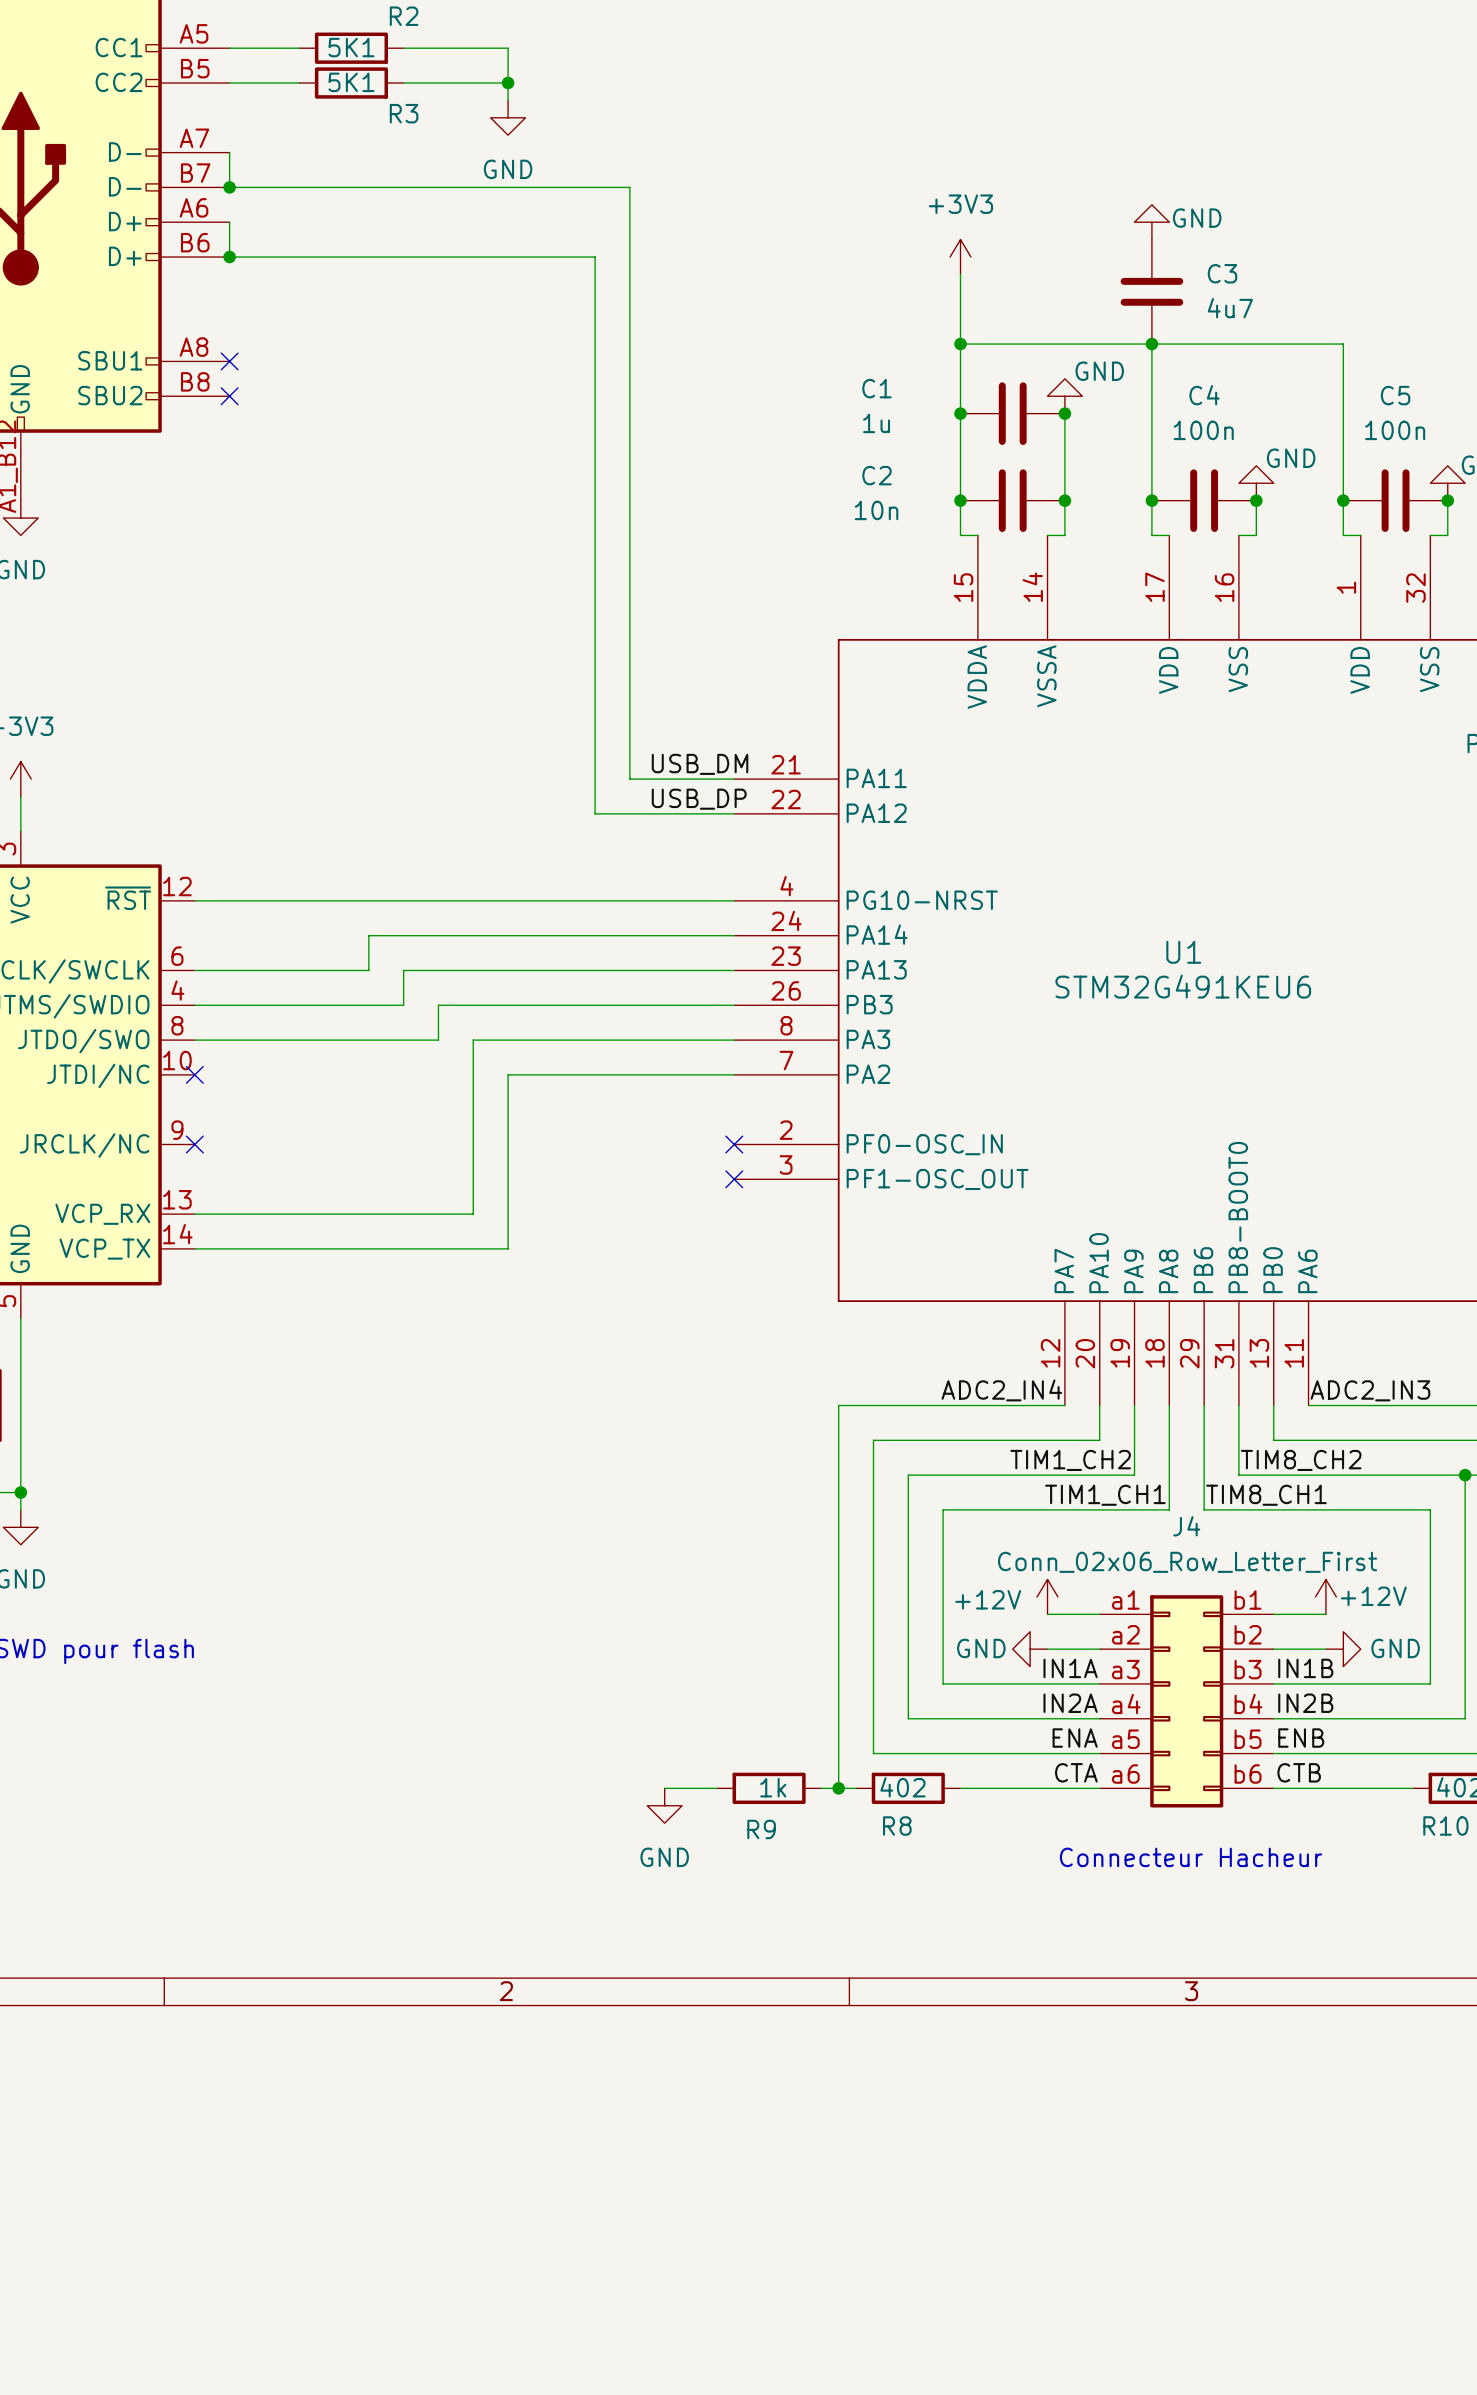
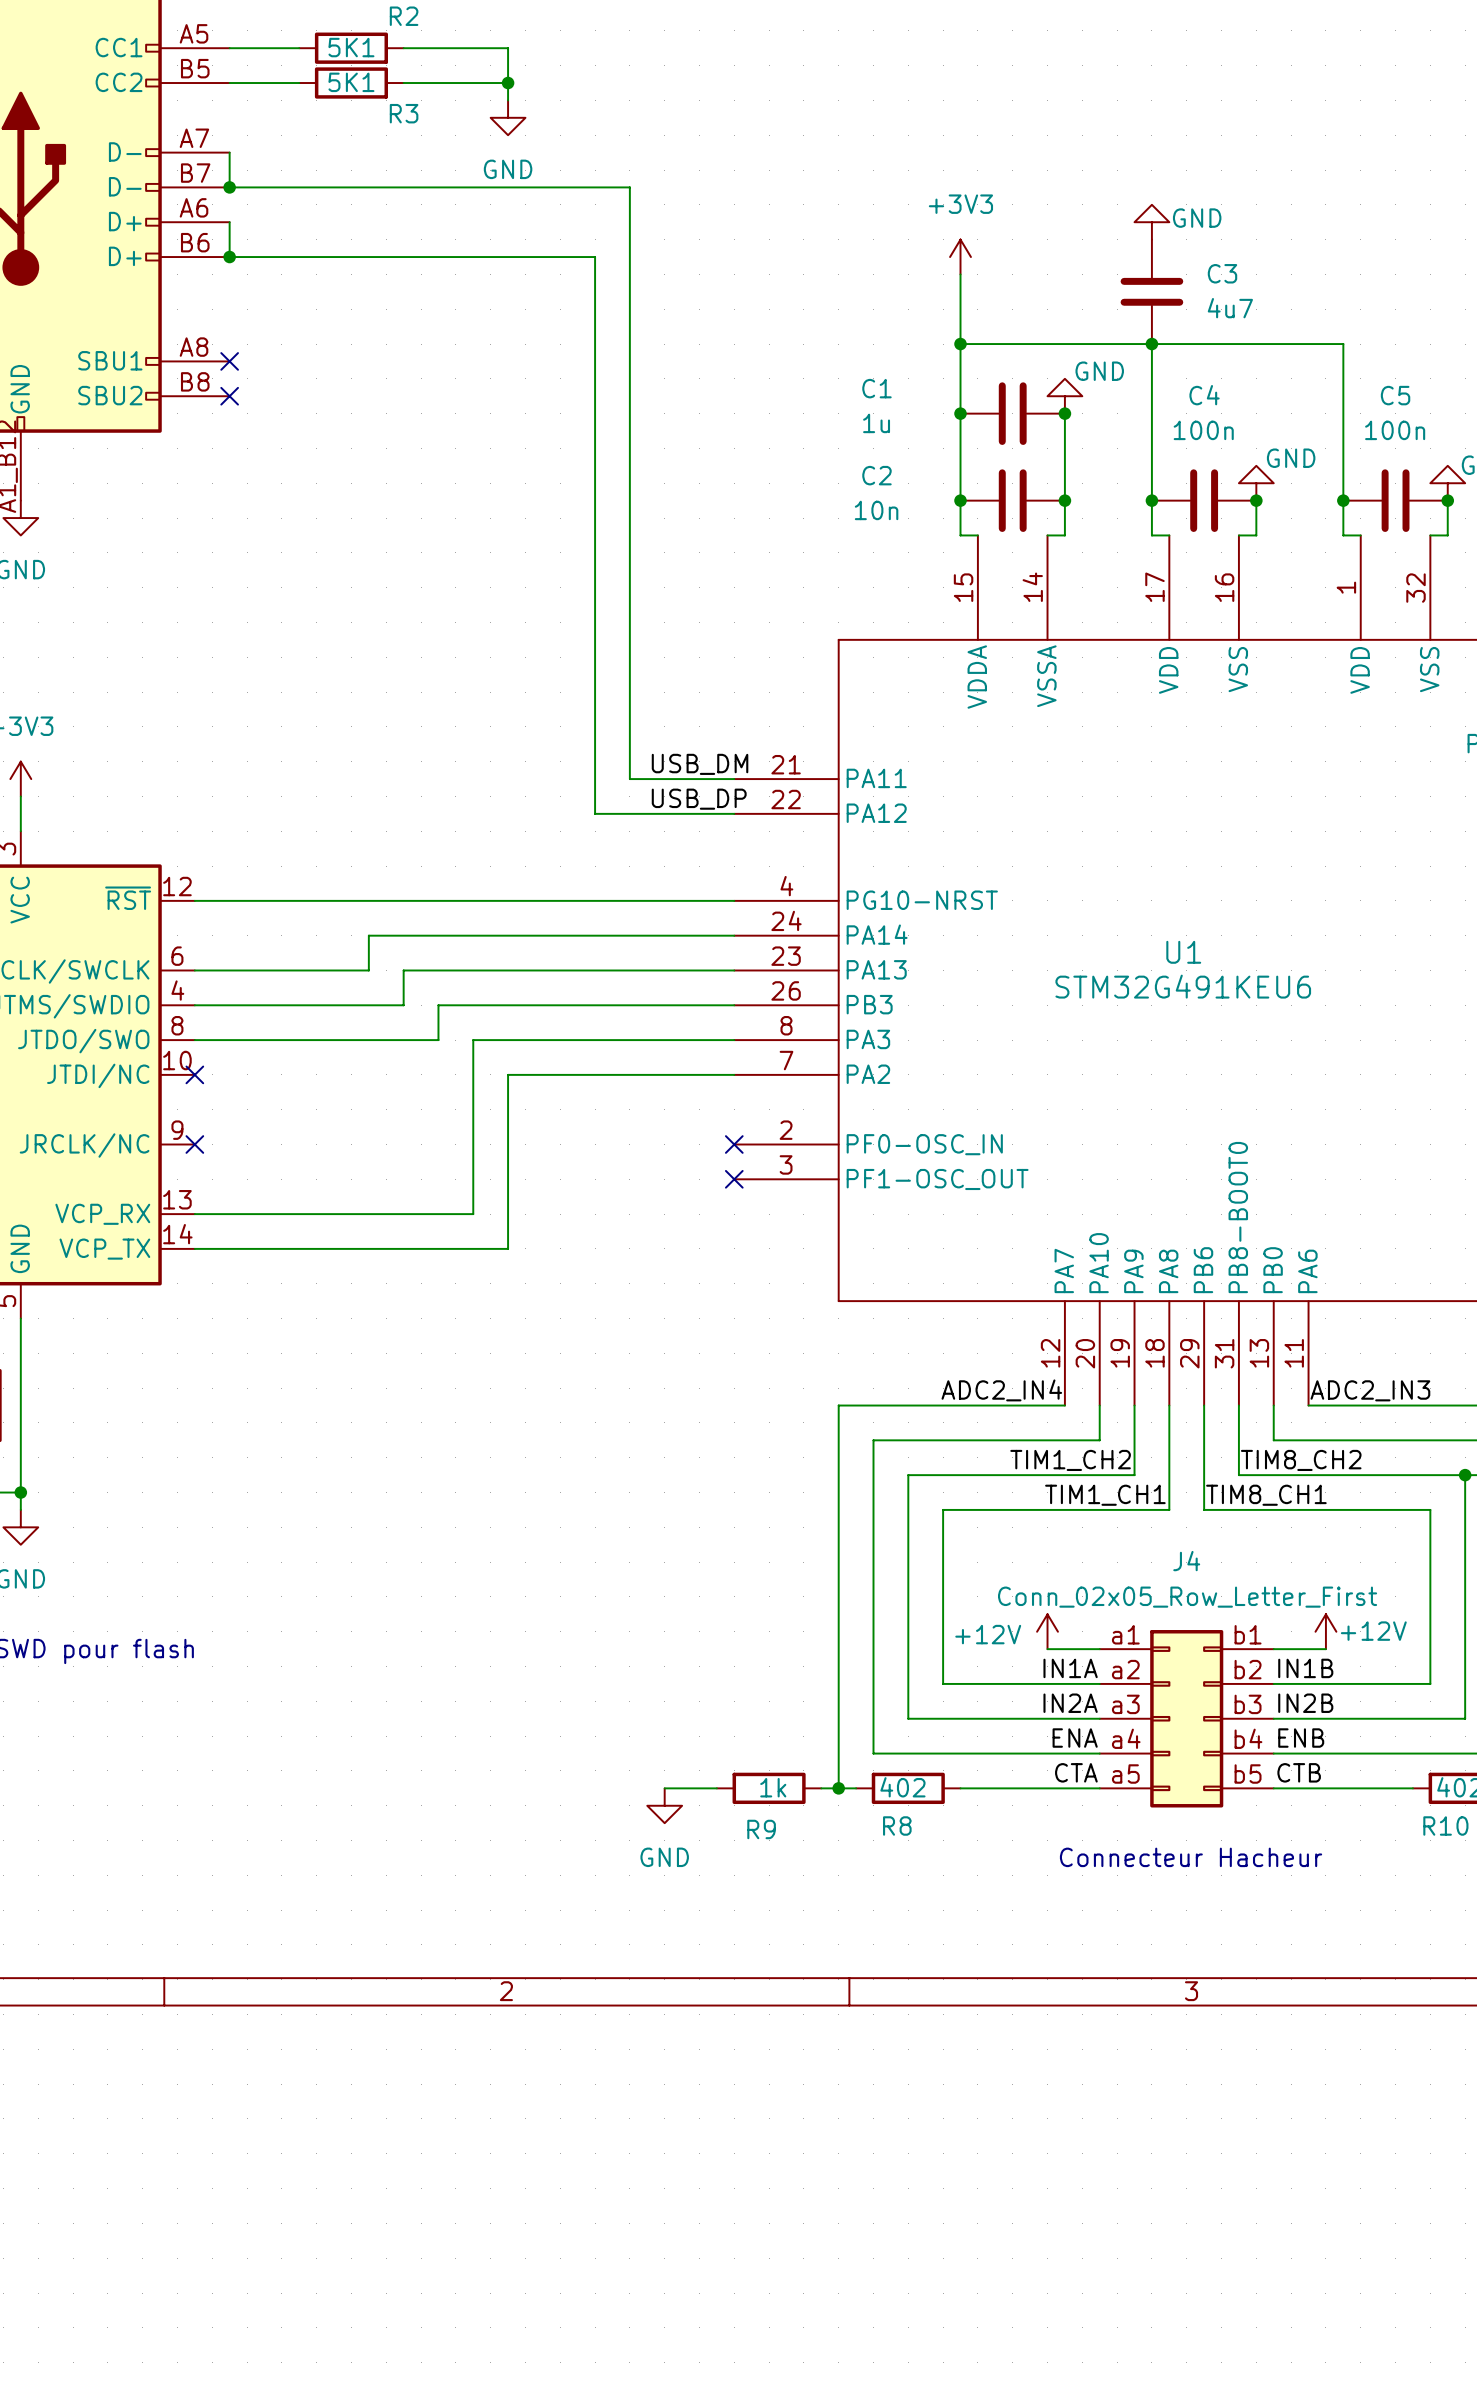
J4 value: Conn_02x06_Row_Letter_First (1187, 1562) -> Conn_02x05_Row_Letter_First (1187, 1597)
J4 symbol: [1099, 1595, 1274, 1808] -> [1099, 1630, 1274, 1808]
power symbol position: +12V (1047, 1596) -> +12V (1047, 1631)
power symbol position: +12V (1325, 1596) -> +12V (1325, 1631)
wire: (1047, 1614) (1099, 1614) -> none
wire: (1273, 1614) (1325, 1614) -> none
power symbol: GND (1030, 1649) -> none
power symbol: GND (1343, 1649) -> none

